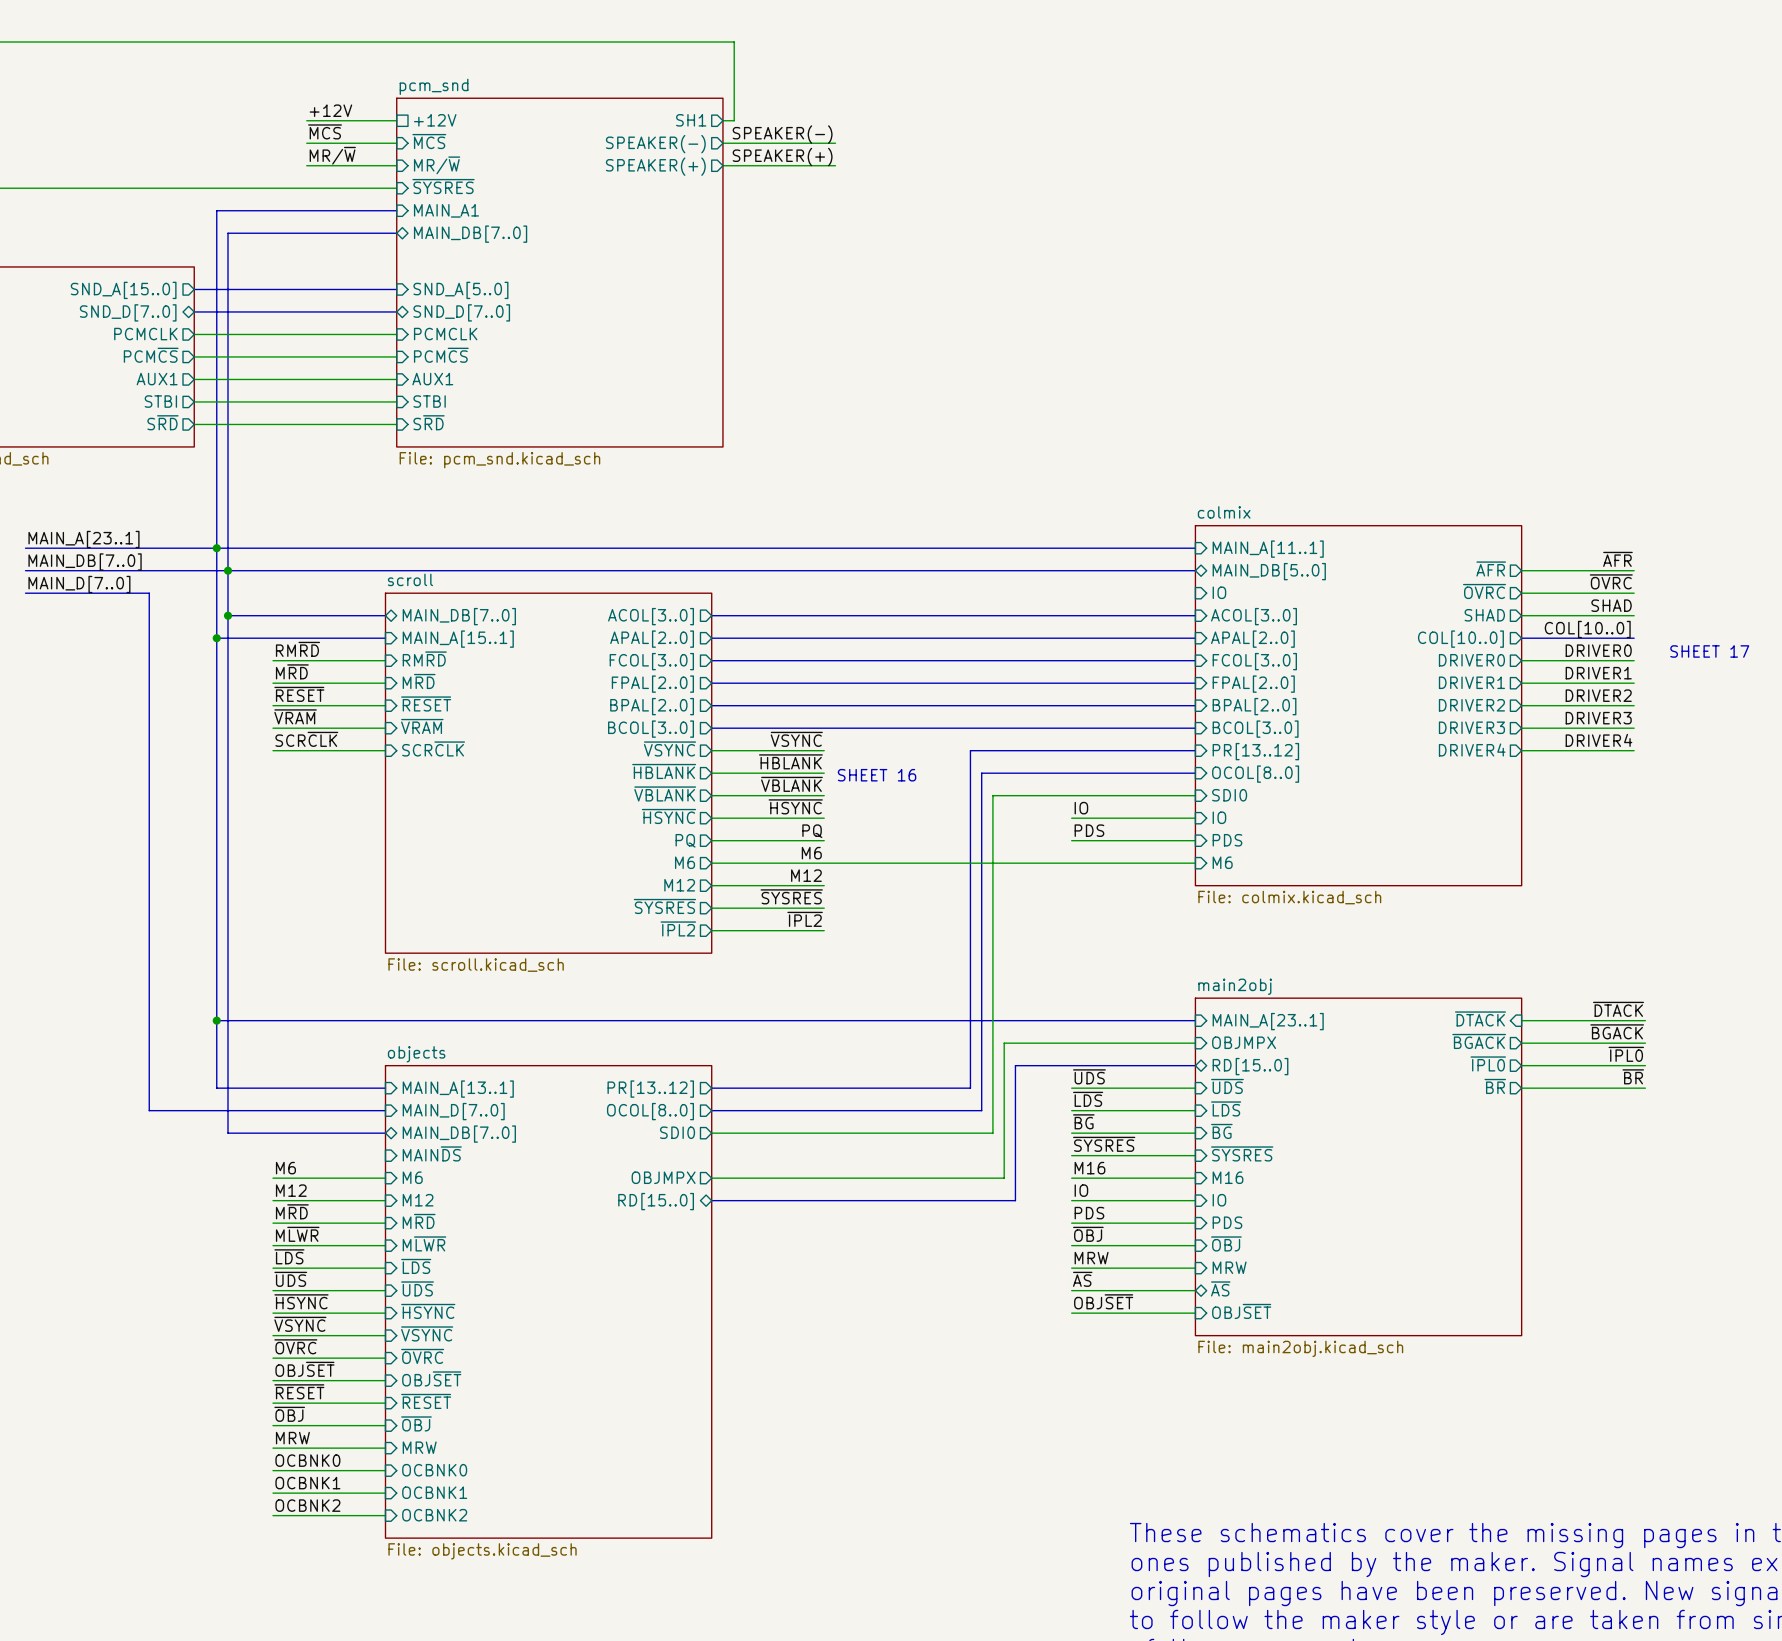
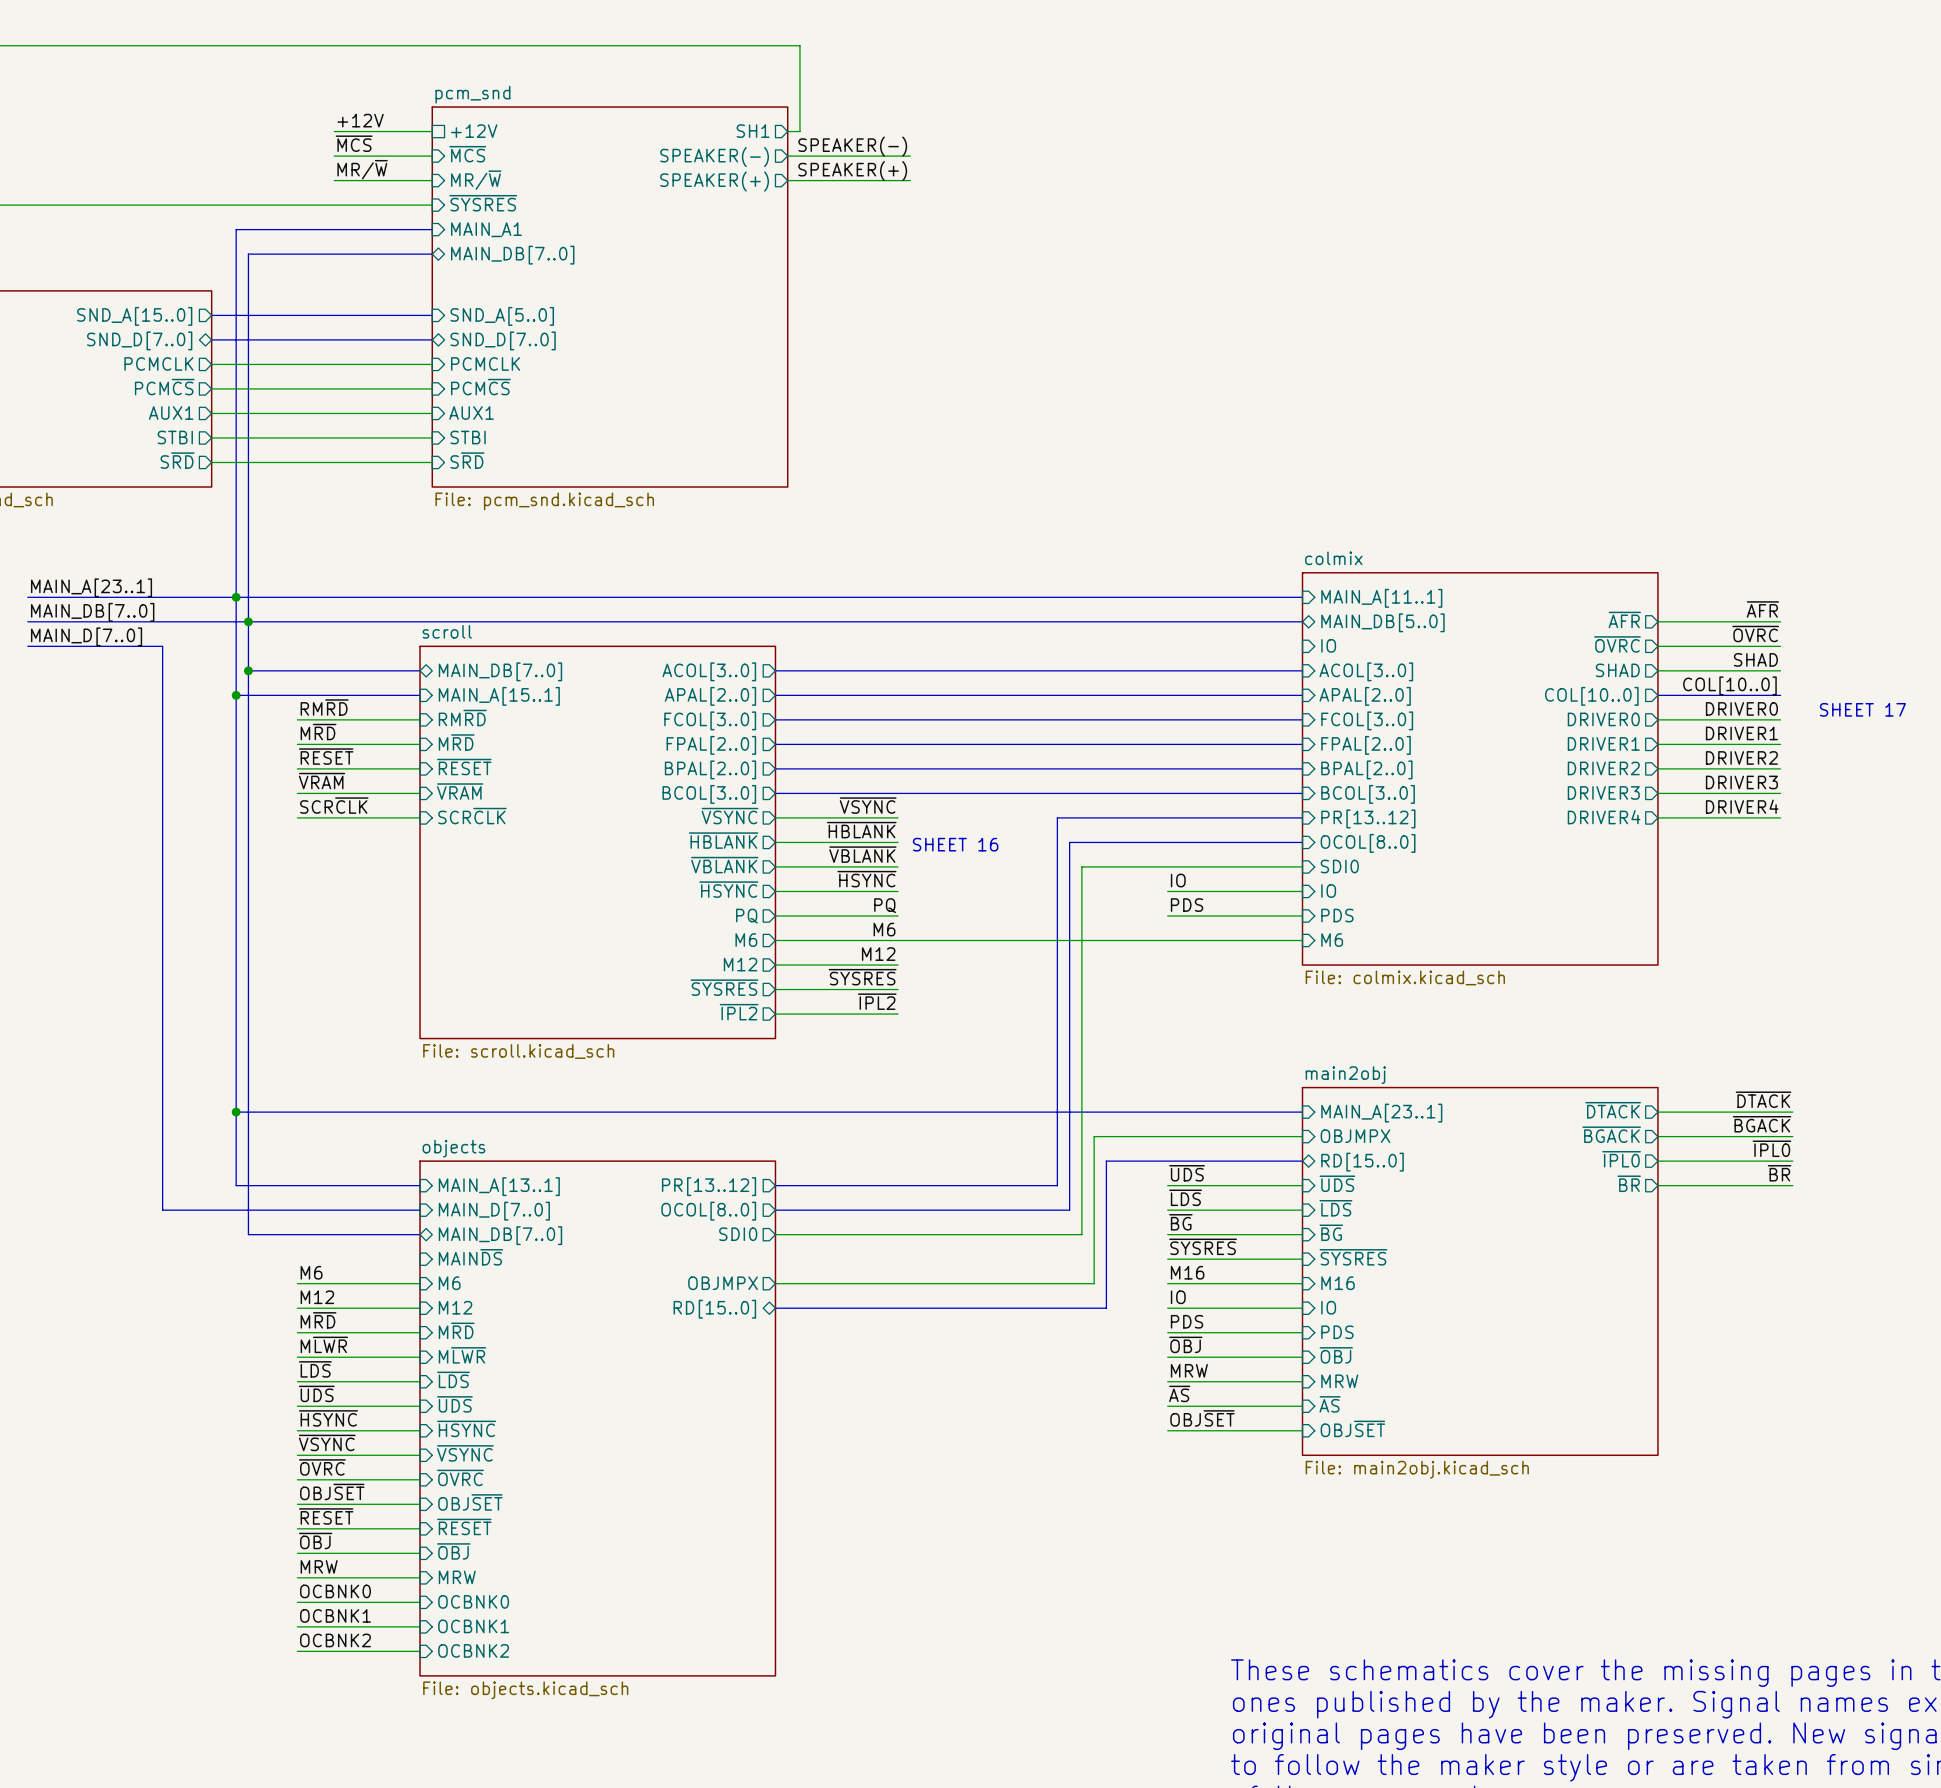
sheet pin shape: input (1480, 1018) -> output (1613, 1110)
sheet pin shape: bidirectional (1220, 1288) -> input (1330, 1404)

